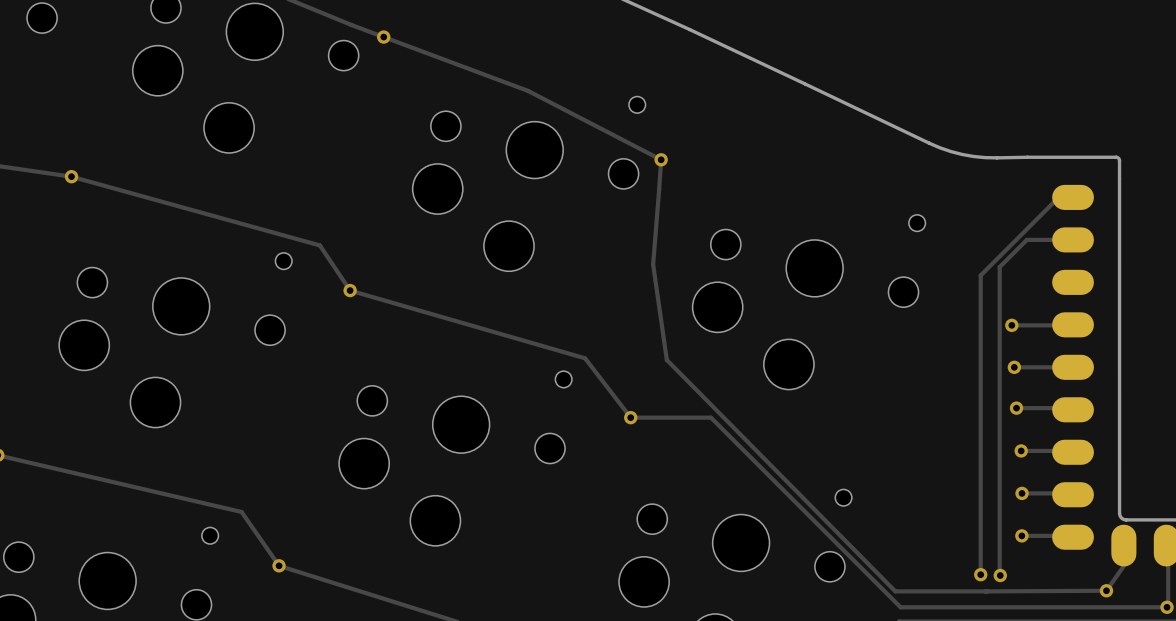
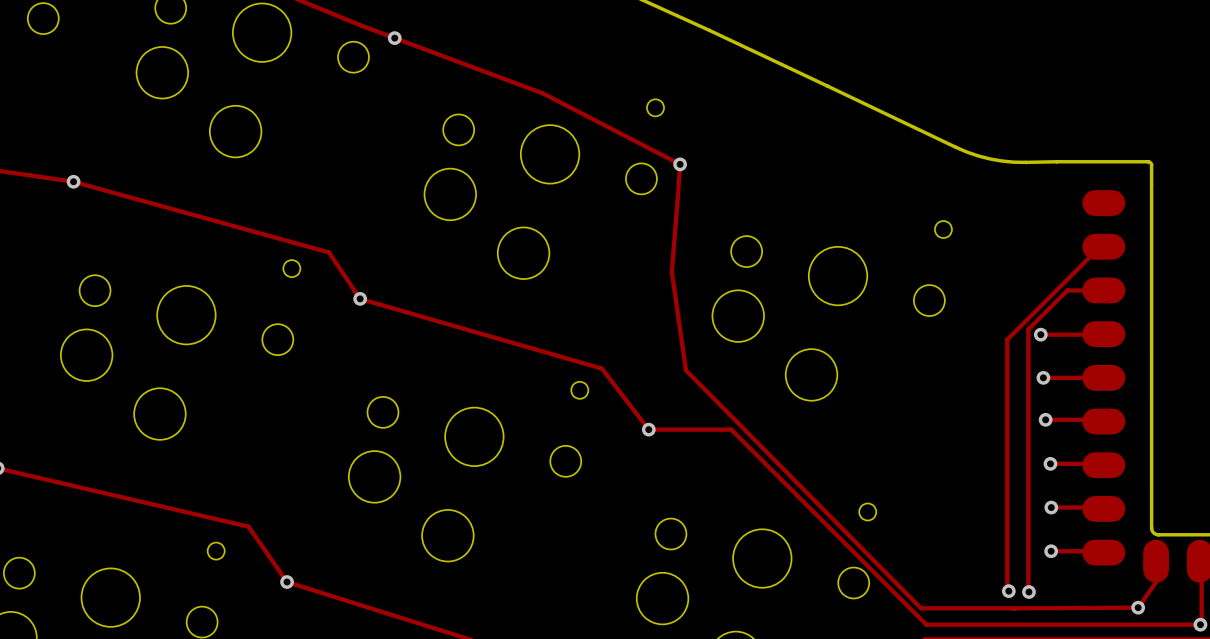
track: (1081, 197) (1058, 197) (980, 275) (980, 574) -> none
track: (1069, 239) (1026, 239) (999, 267) (999, 320) -> (1112, 290) (1067, 290) (1028, 329)
track: none -> (1100, 246) (1007, 339) (1007, 591)

